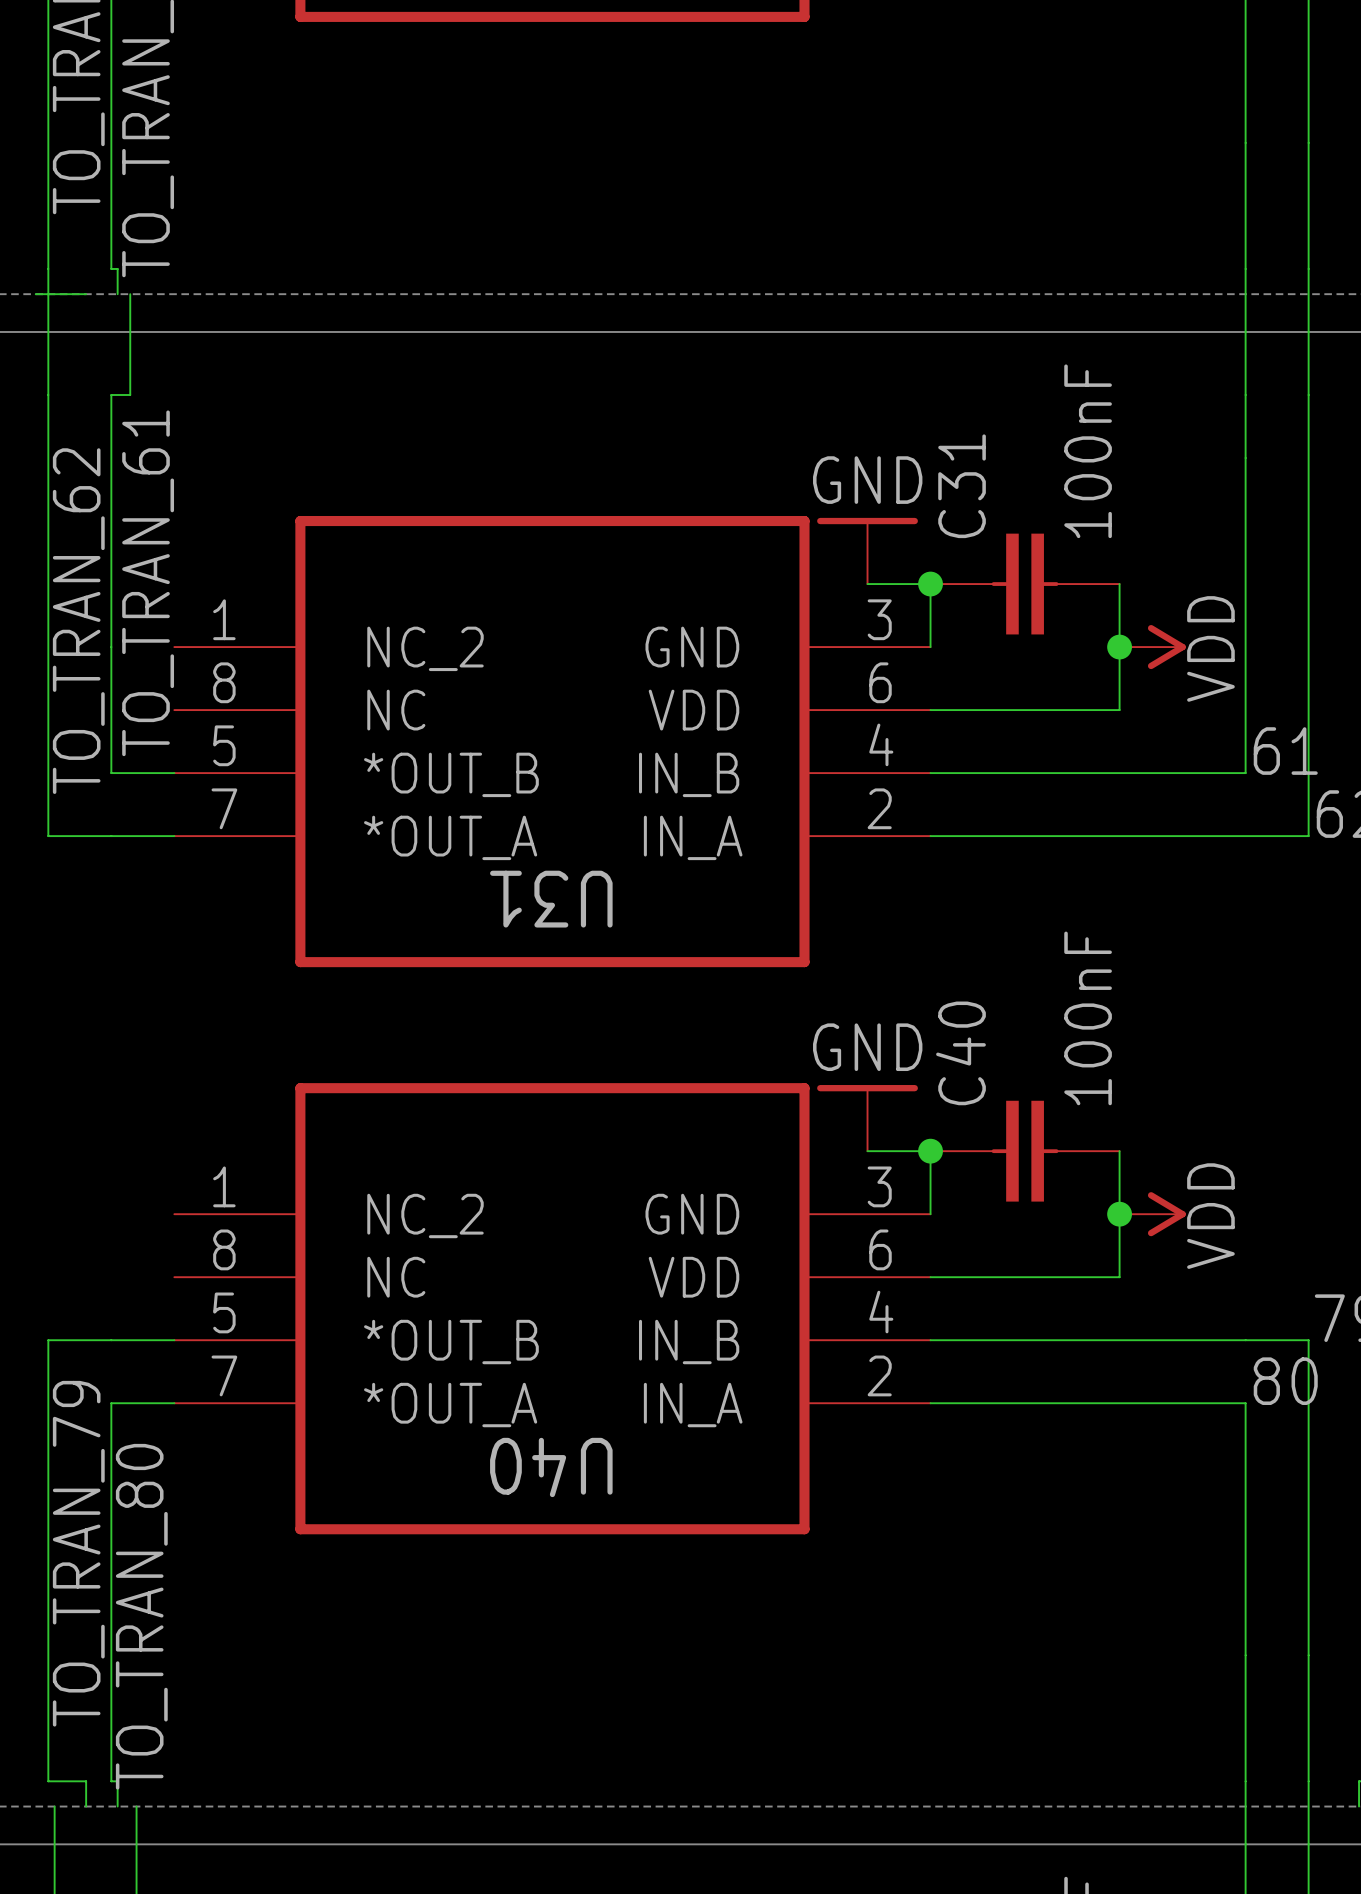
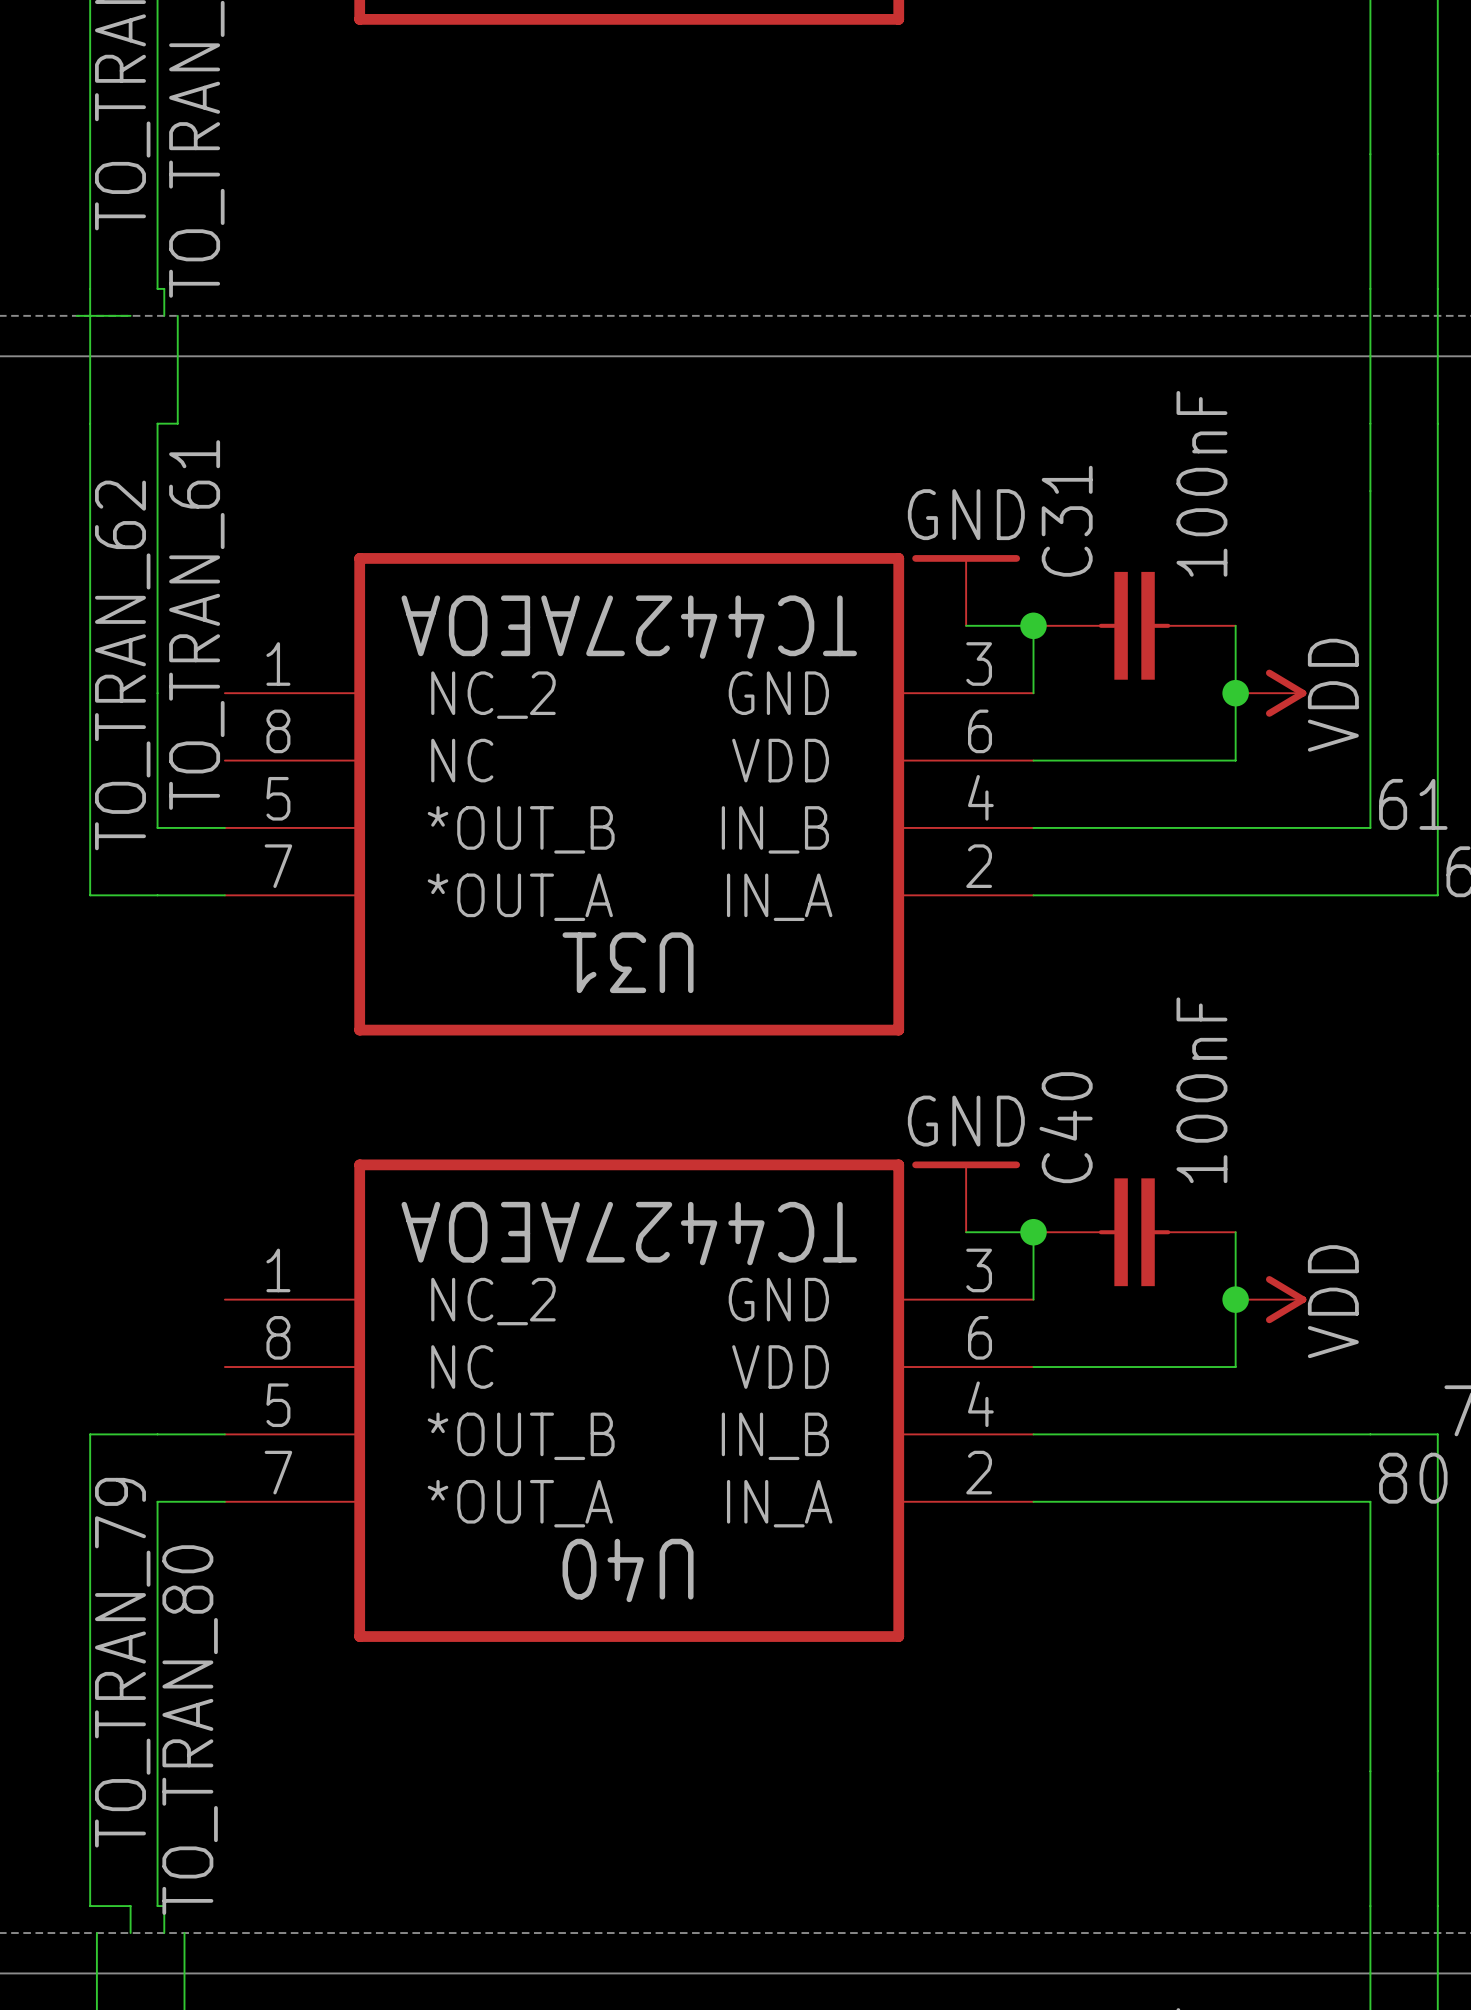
U31 value: none -> TC4427AEOA (629, 627)
U40 value: none -> TC4427AEOA (629, 1233)

